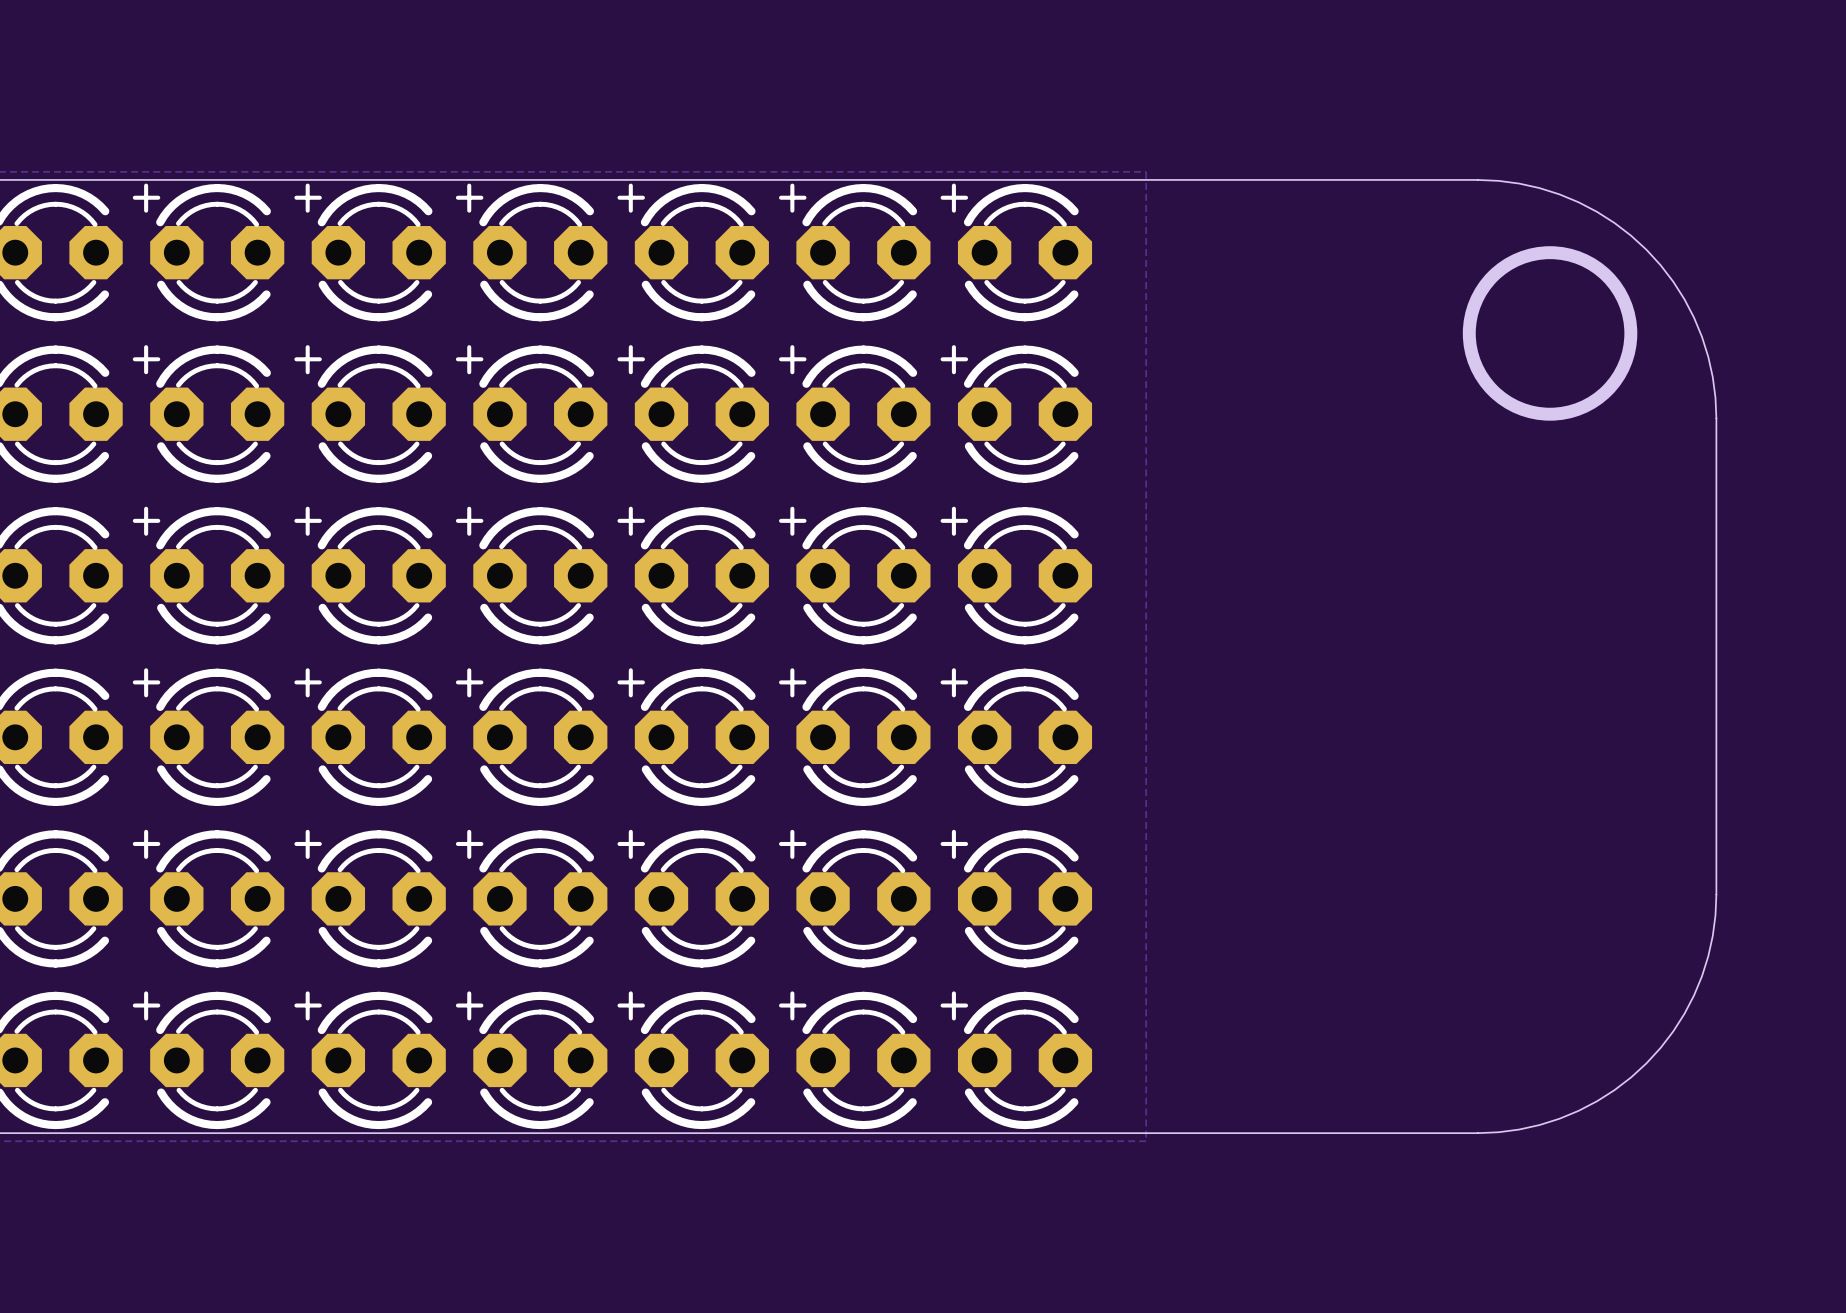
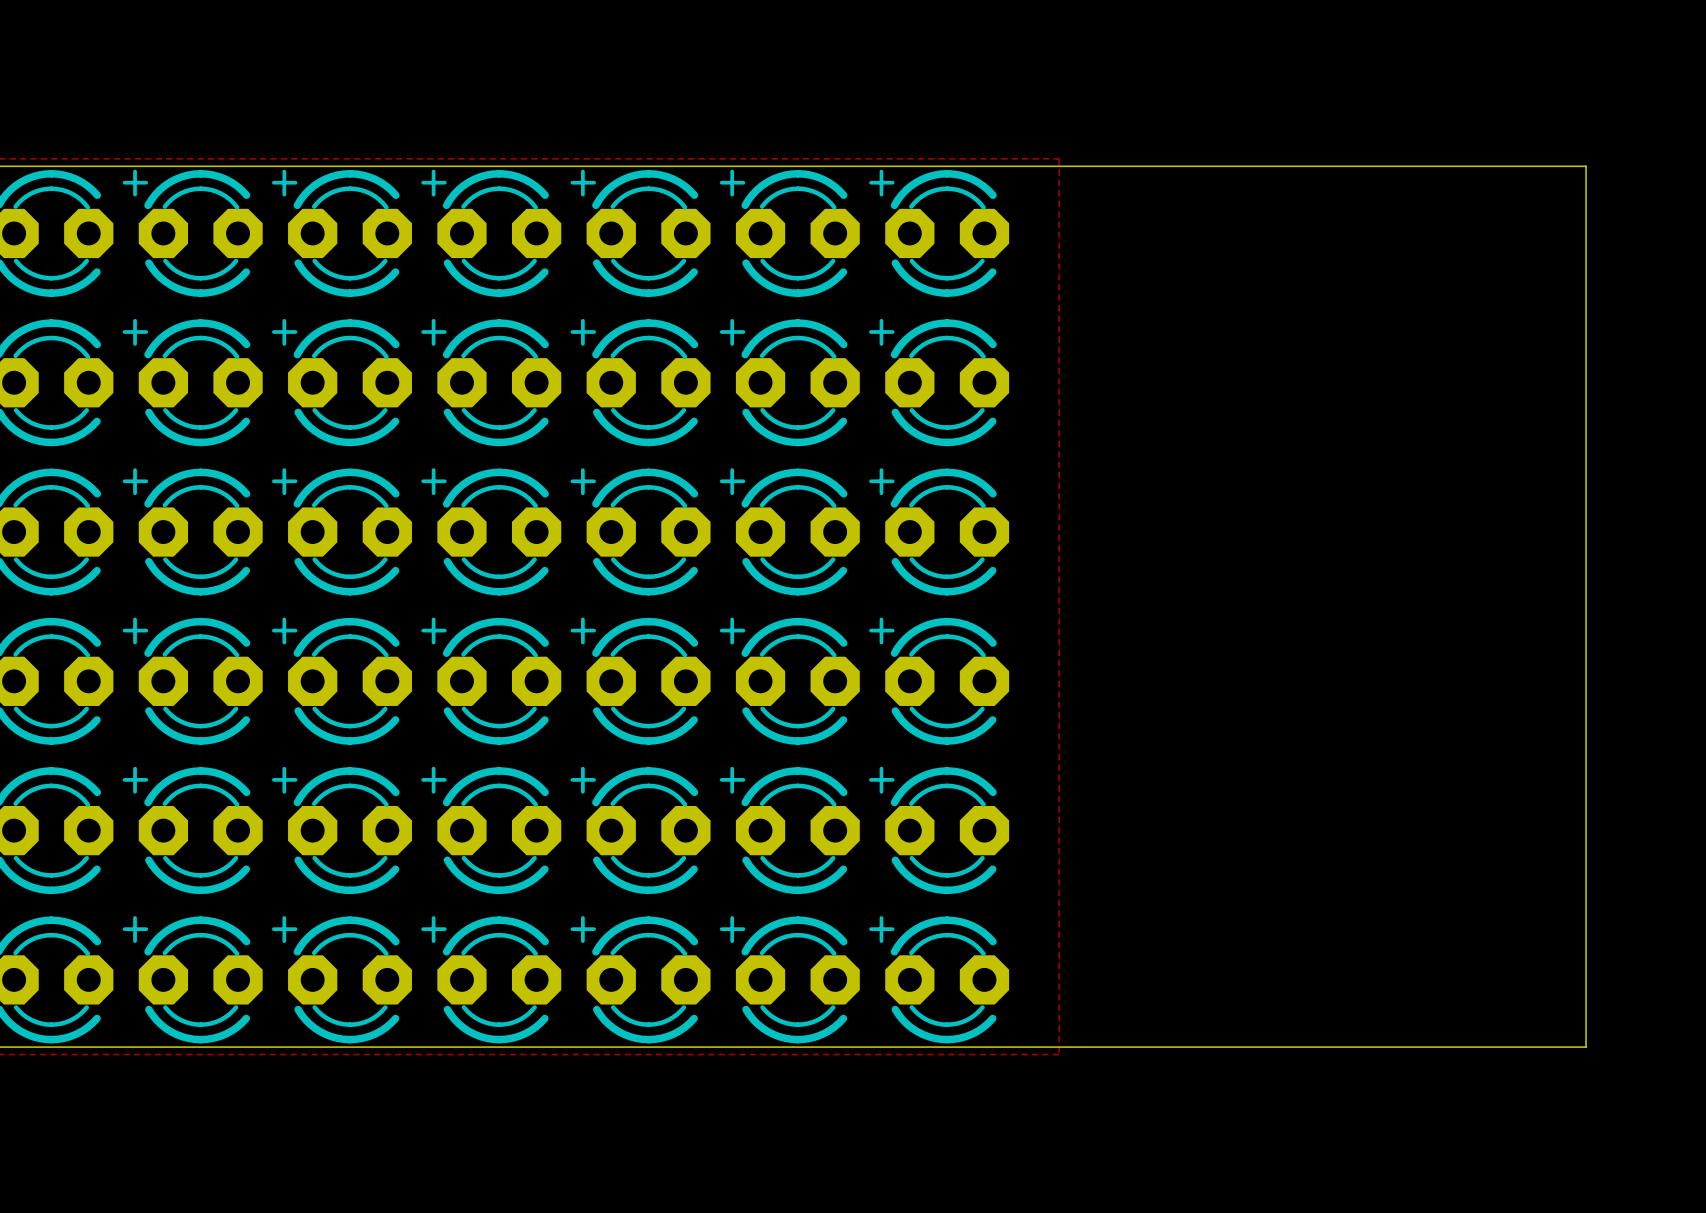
board edge: (1477, 179) (1519, 183) (1559, 194) (1597, 211) (1631, 235) (1646, 249) (1660, 265) (1684, 299) (1702, 336) (1712, 377) (1716, 418) -> (1365, 166) (1586, 166) (1586, 386)
round board edge: [1462, 246, 1638, 421] -> none
board edge: (1716, 894) (1712, 936) (1702, 976) (1684, 1013) (1660, 1047) (1646, 1063) (1631, 1077) (1597, 1101) (1559, 1118) (1519, 1129) (1477, 1133) -> (1586, 826) (1586, 1047) (1365, 1047)

